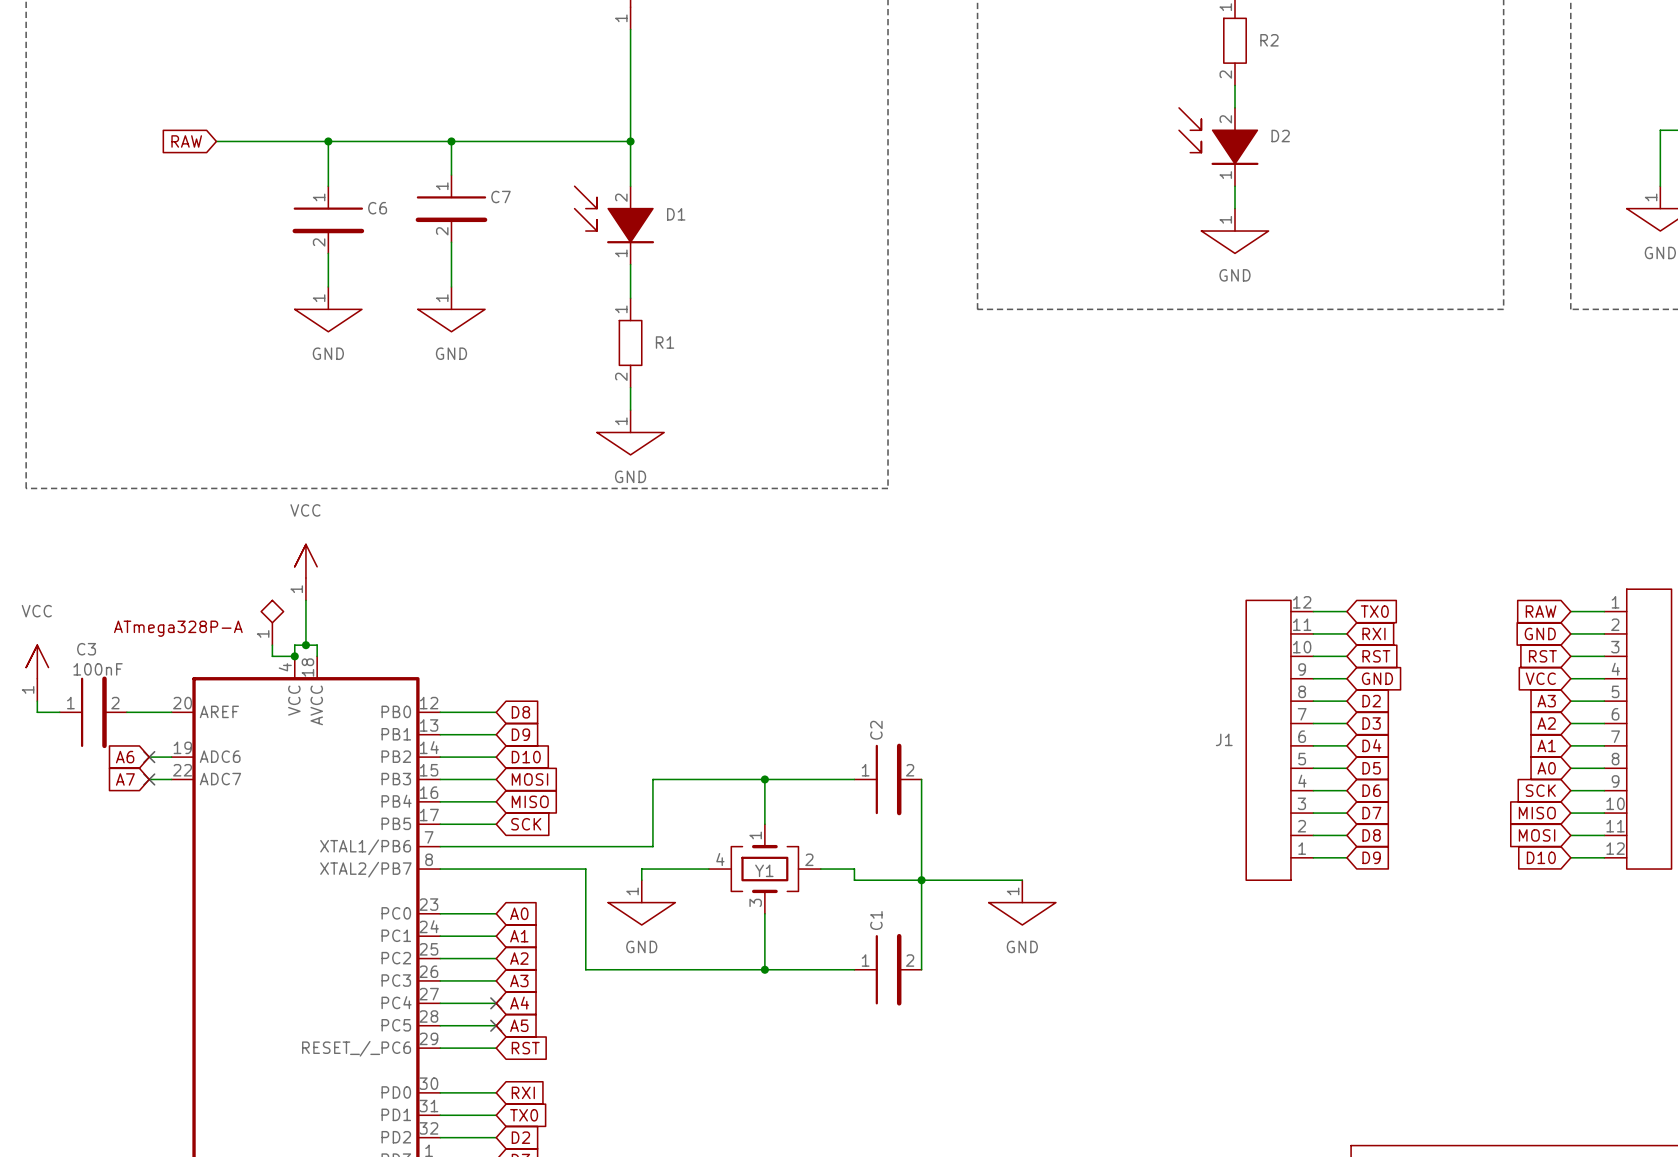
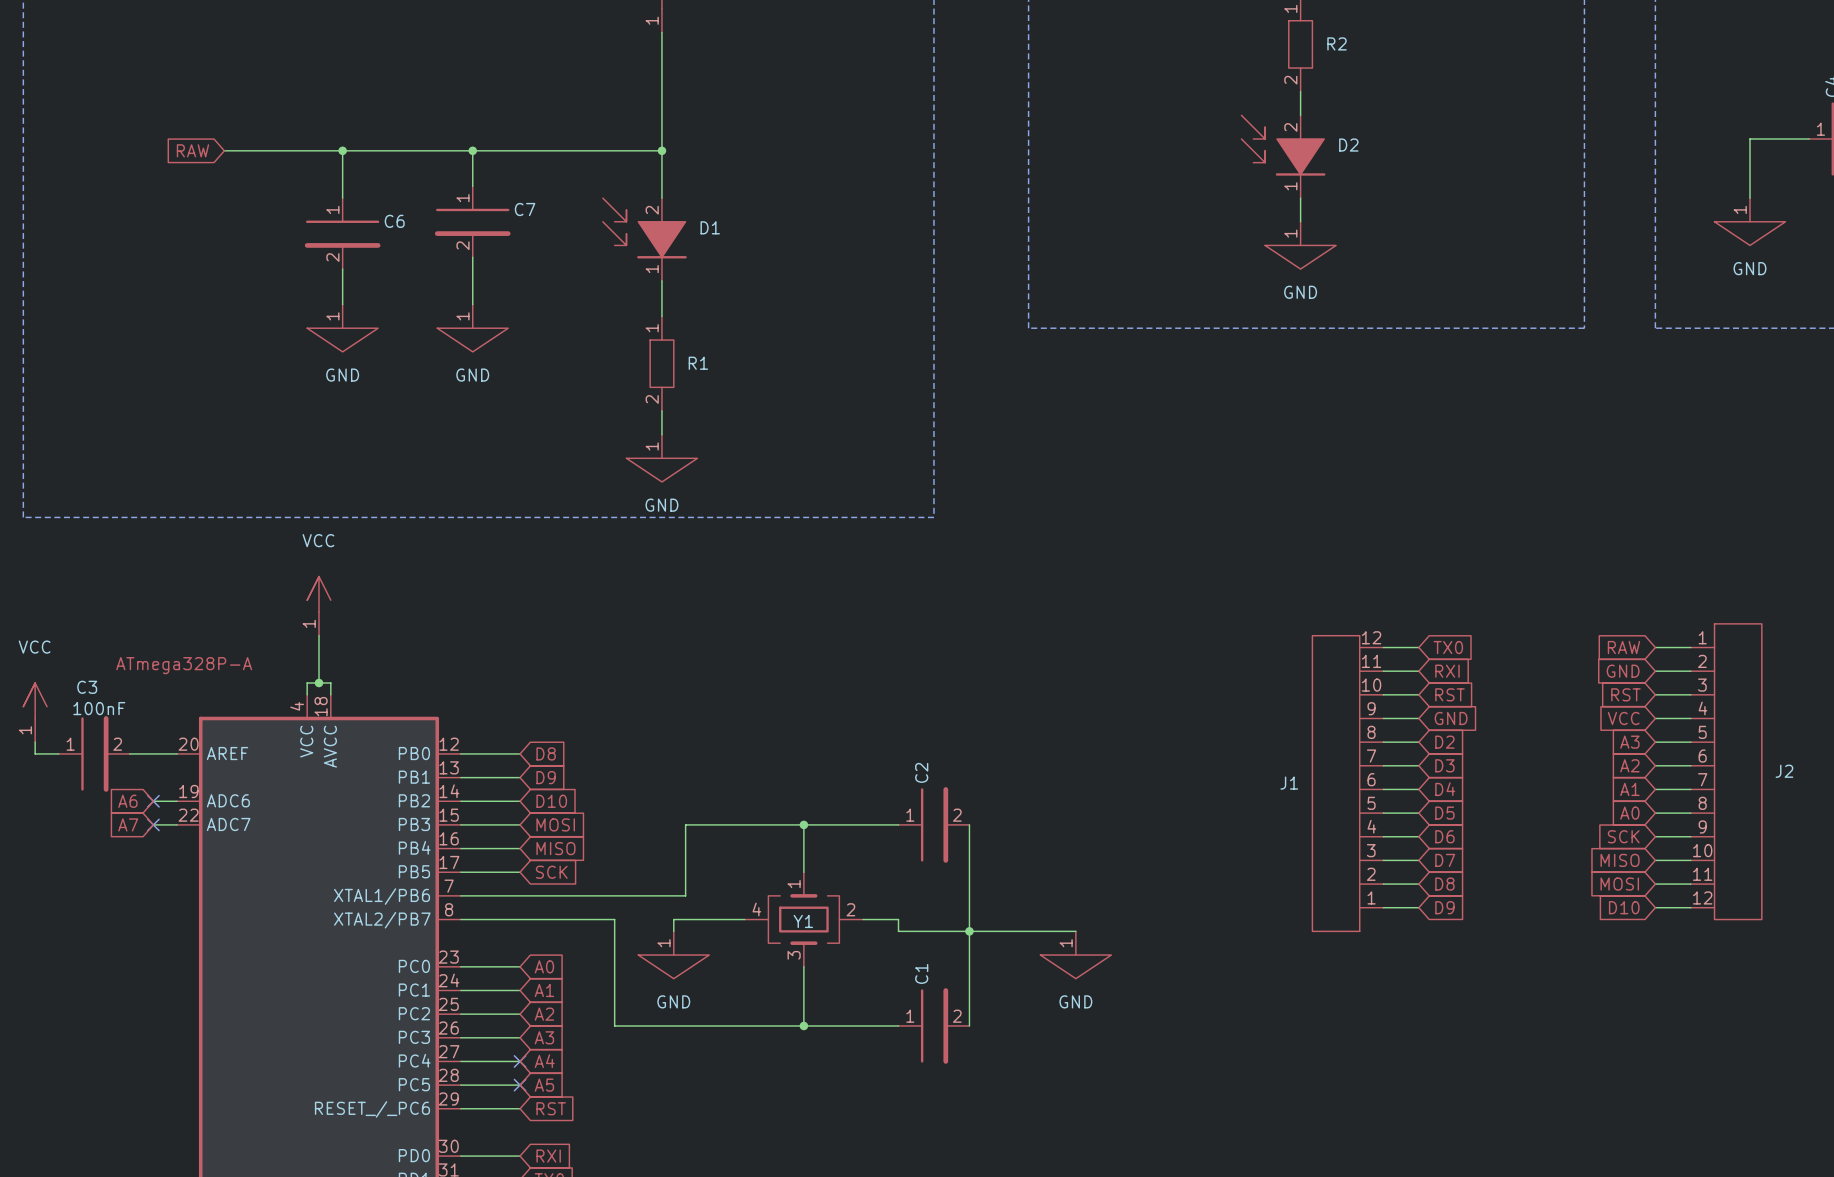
power symbol: (272, 622) -> none
wire: (272, 645) (272, 656) (294, 656) -> none
junction: (294, 656) -> none

